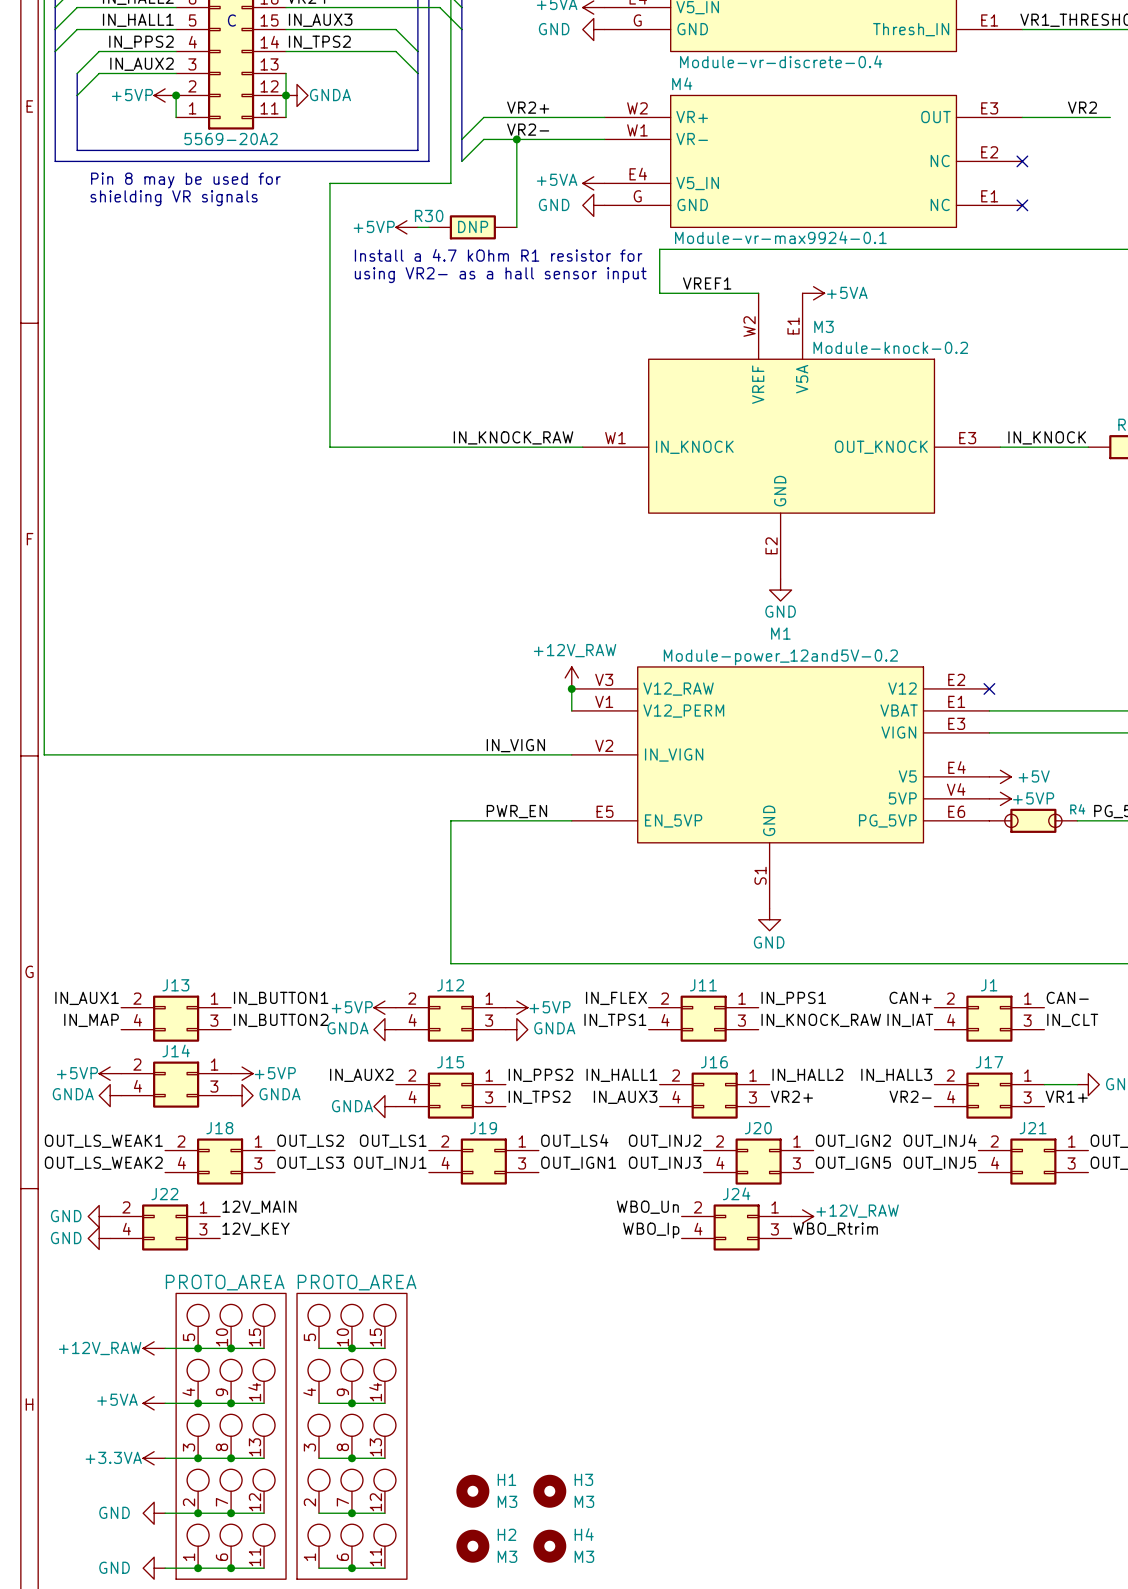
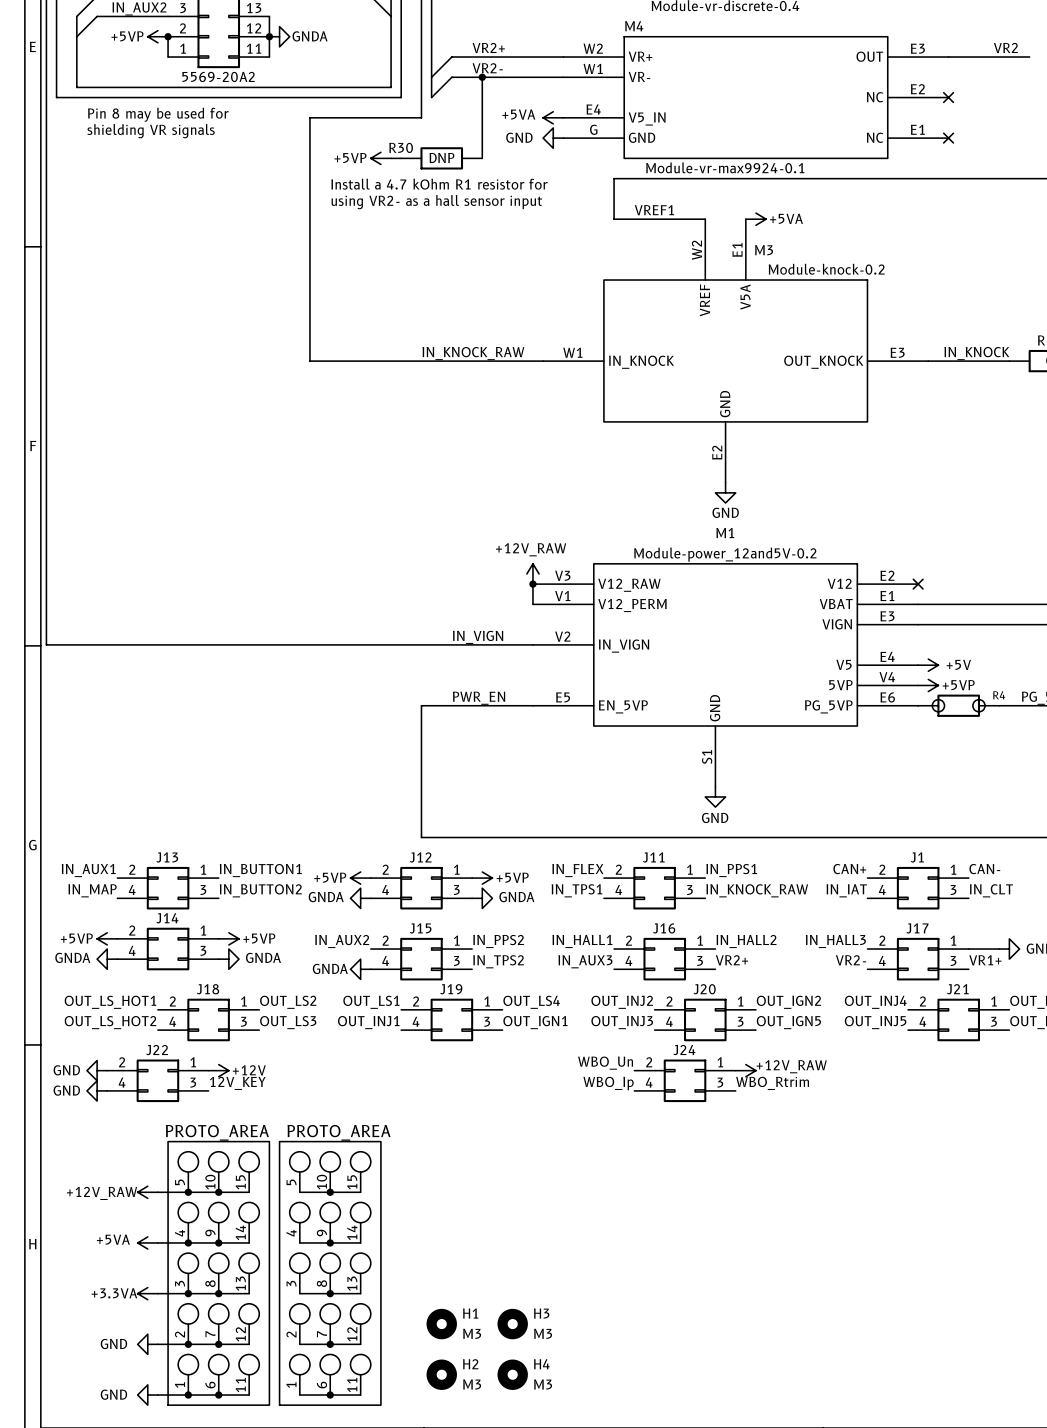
label: OUT_LS_WEAK1 (103, 1141) -> OUT_LS_HOT1 (110, 1002)
label: OUT_LS_WEAK2 (103, 1163) -> OUT_LS_HOT2 (110, 1022)
label: 12V_MAIN (259, 1207) -> none
power symbol: none -> +12V (218, 1070)

